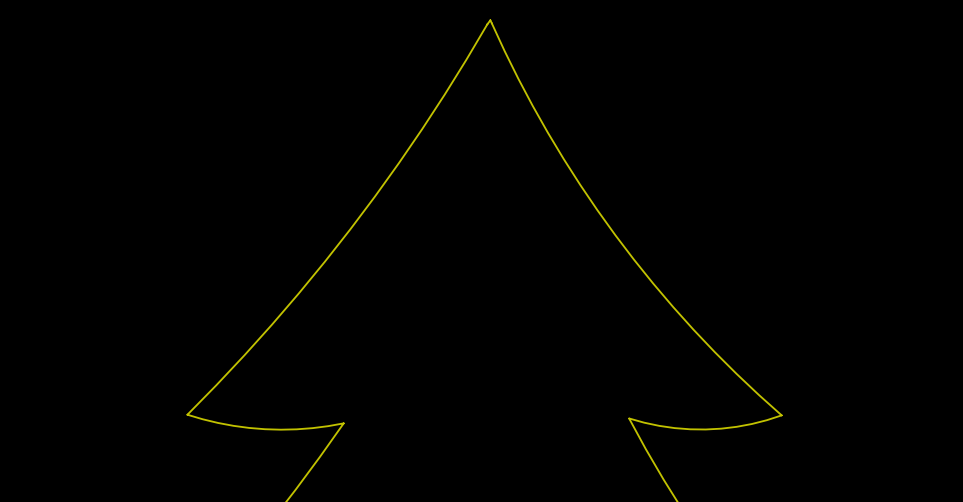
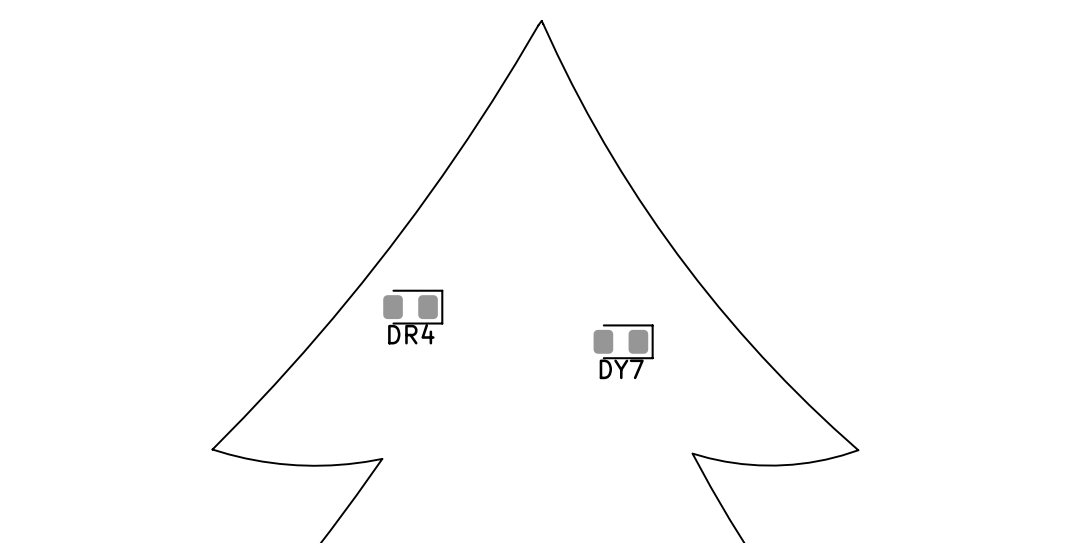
DR4: none -> (413, 307)
DY7: none -> (623, 341)

